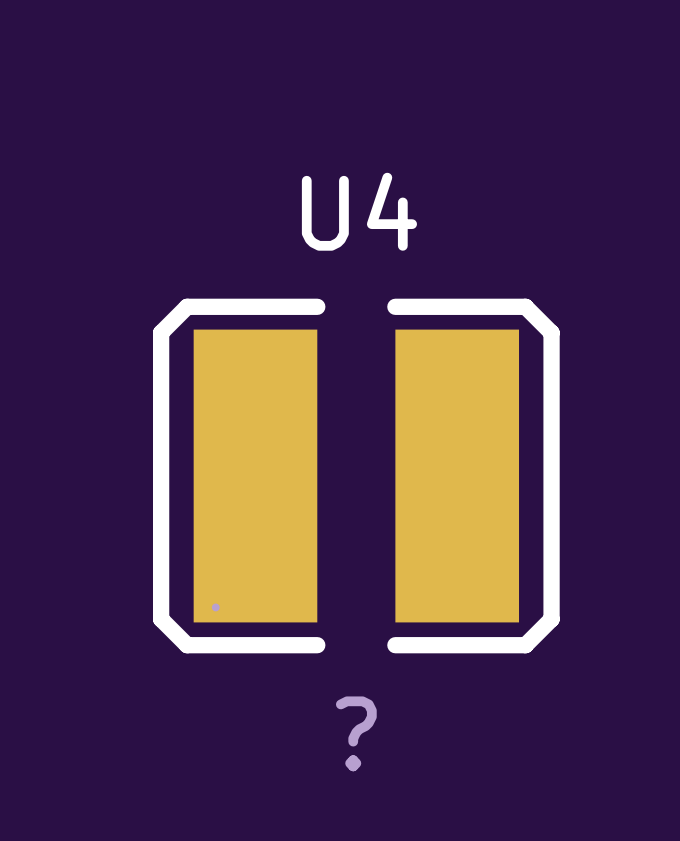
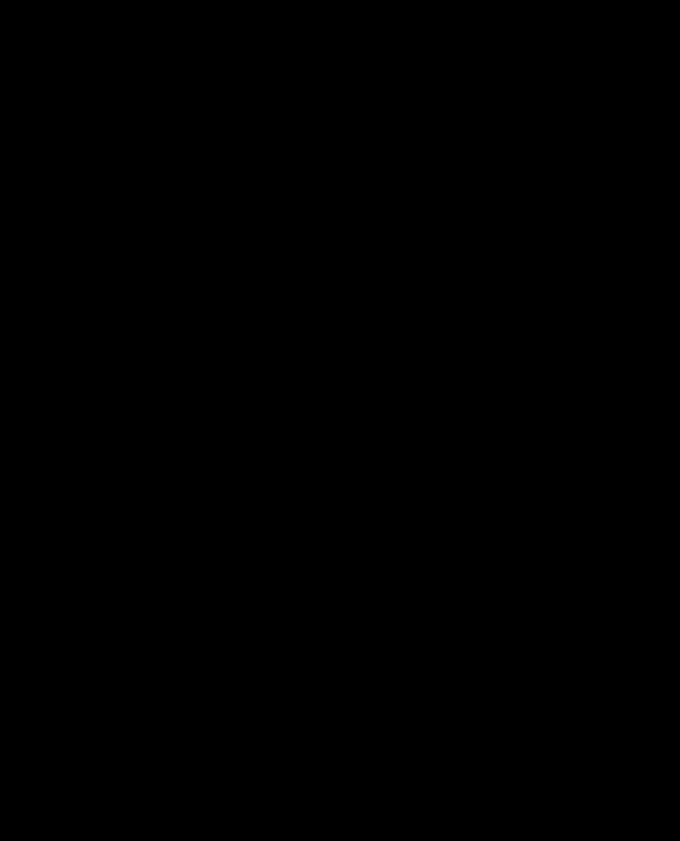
U4: ? (356, 476) -> none

